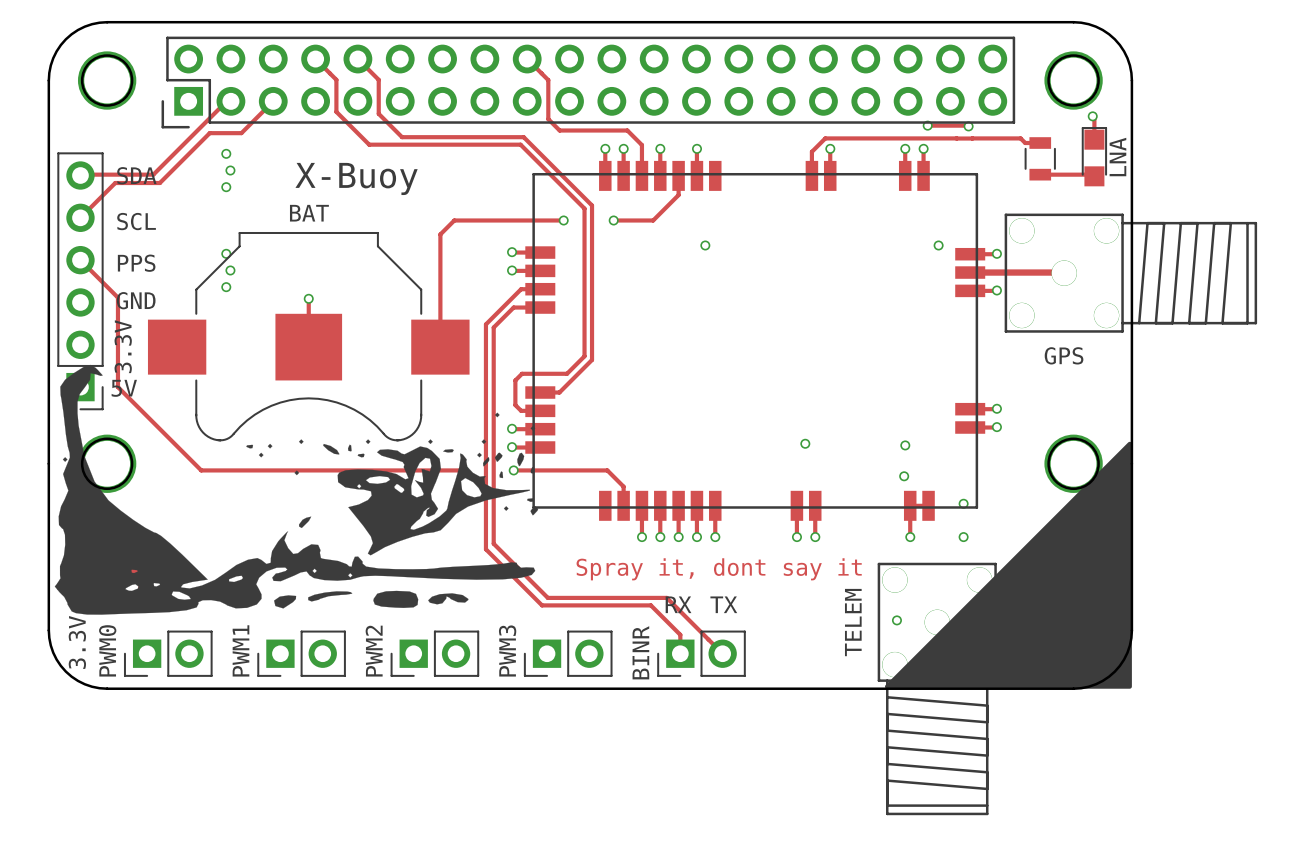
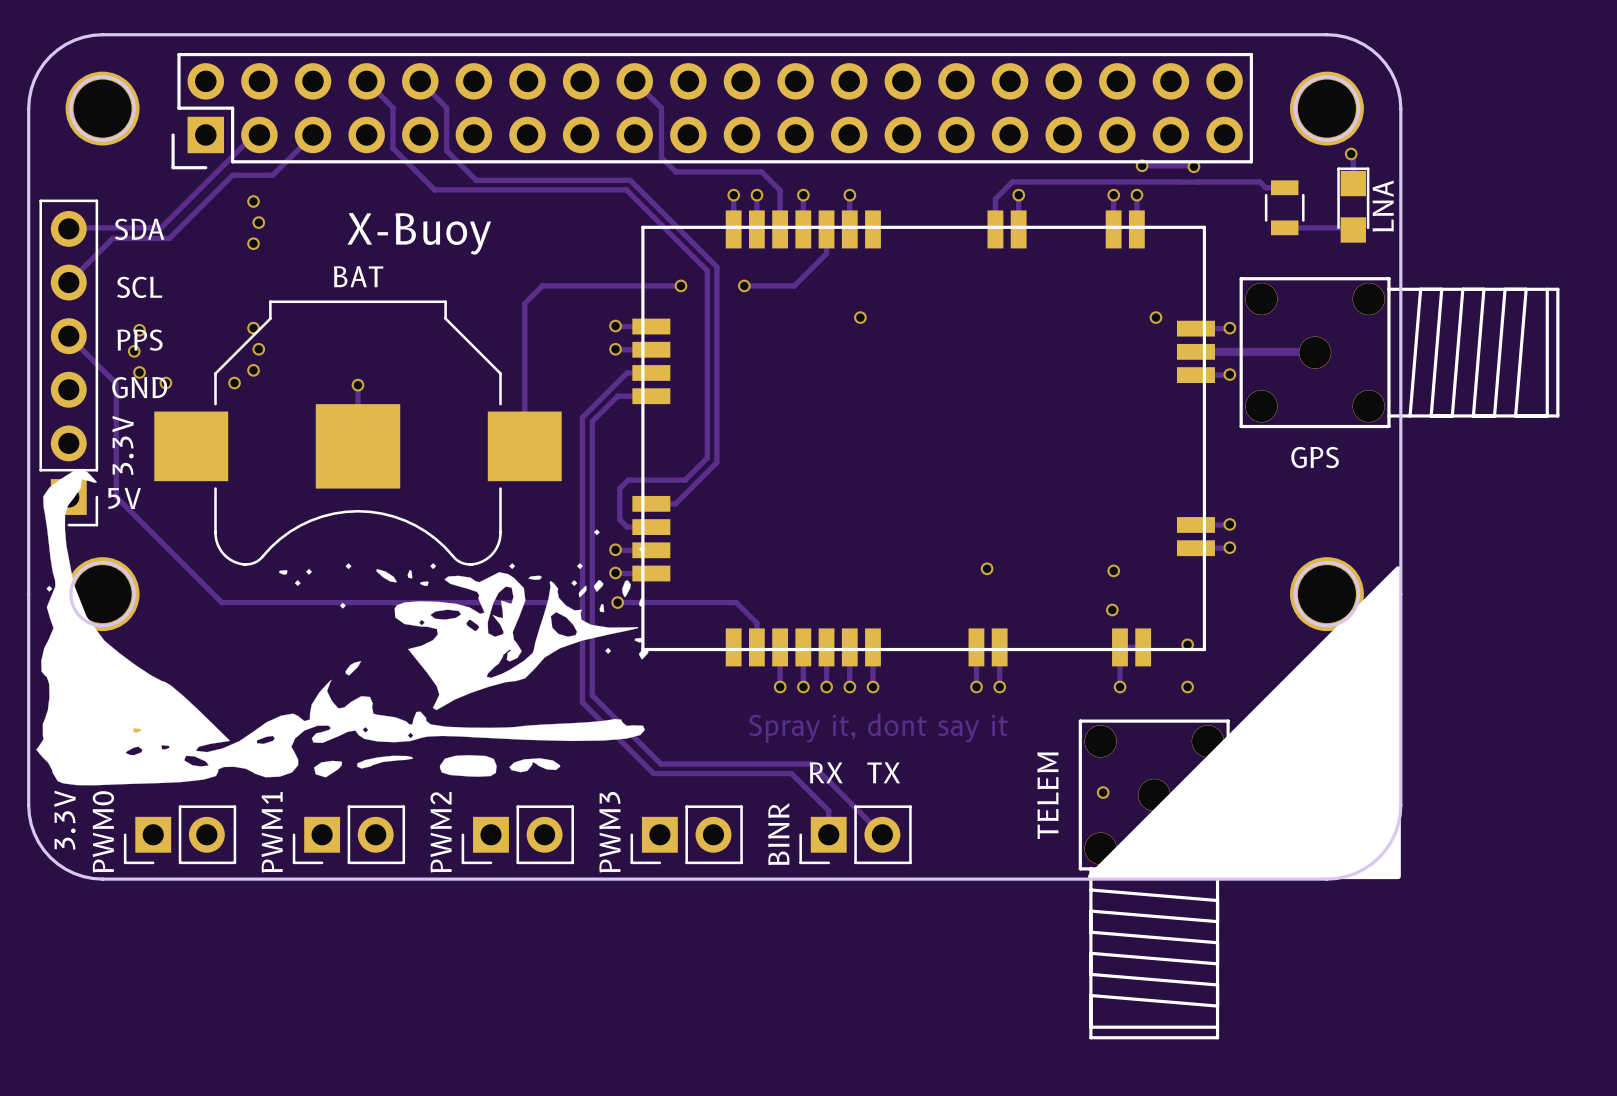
via: none -> (139, 330)
via: none -> (134, 351)
via: none -> (139, 372)
via: none -> (165, 383)
via: none -> (234, 383)

